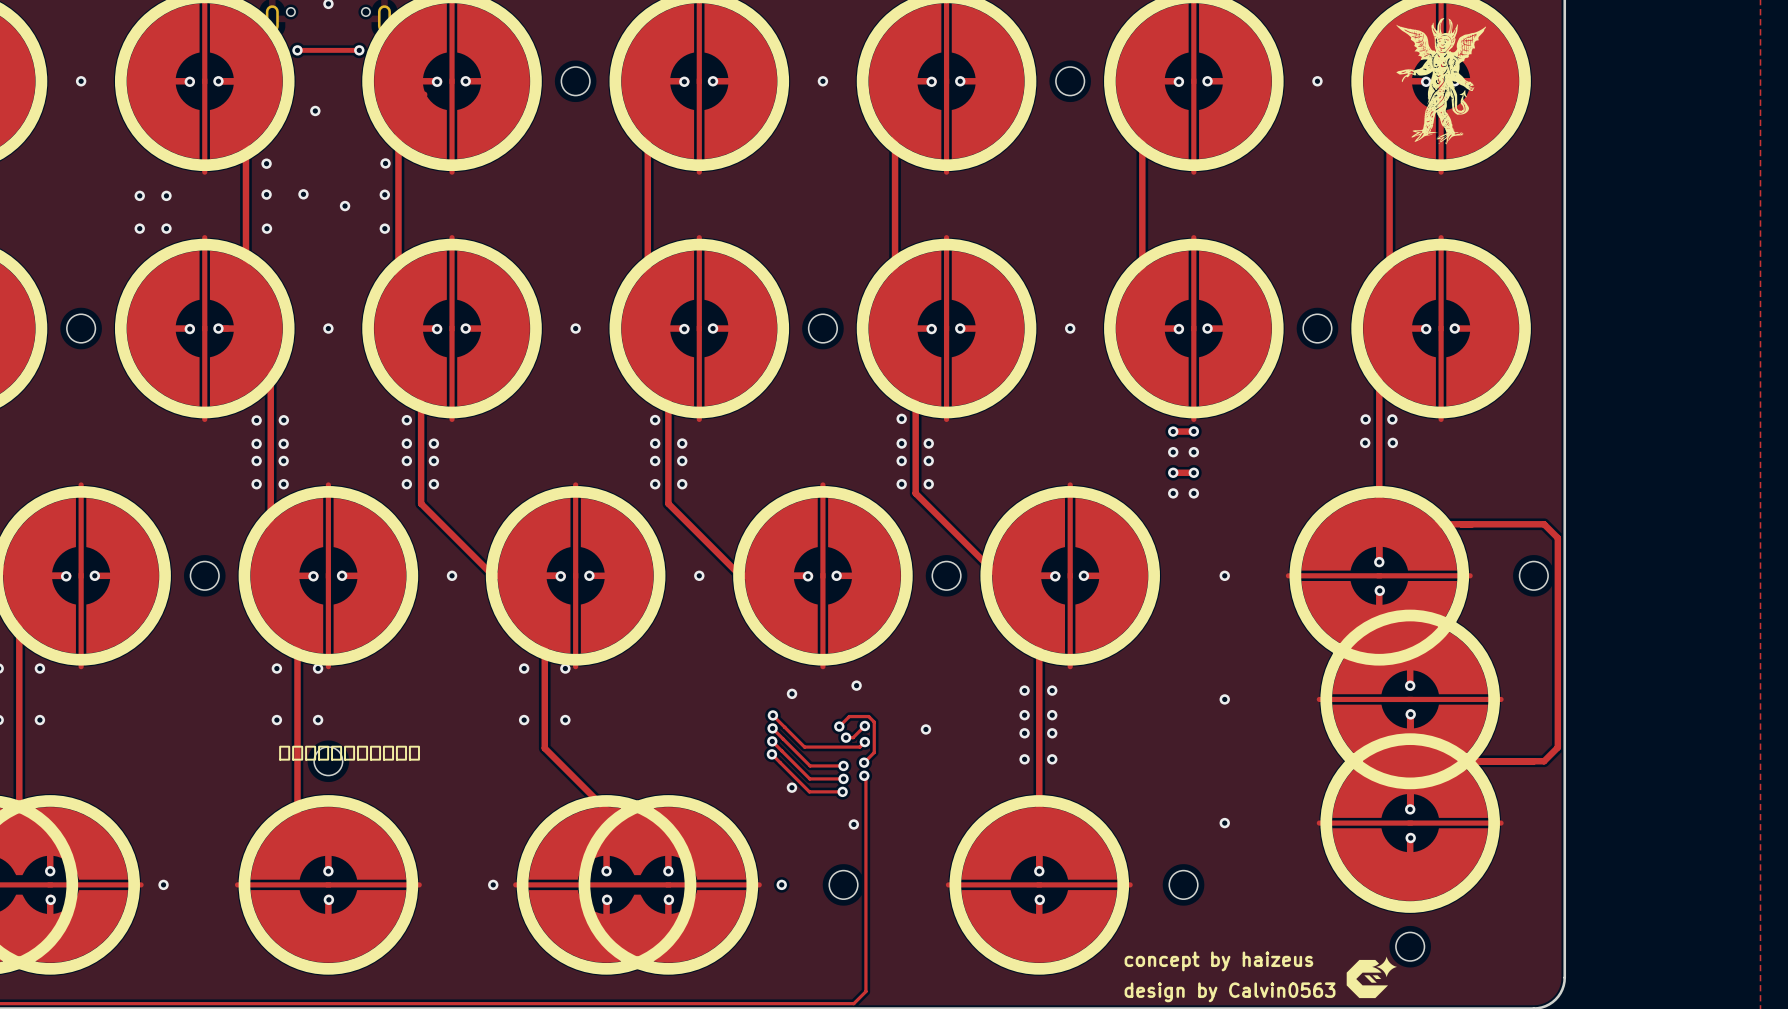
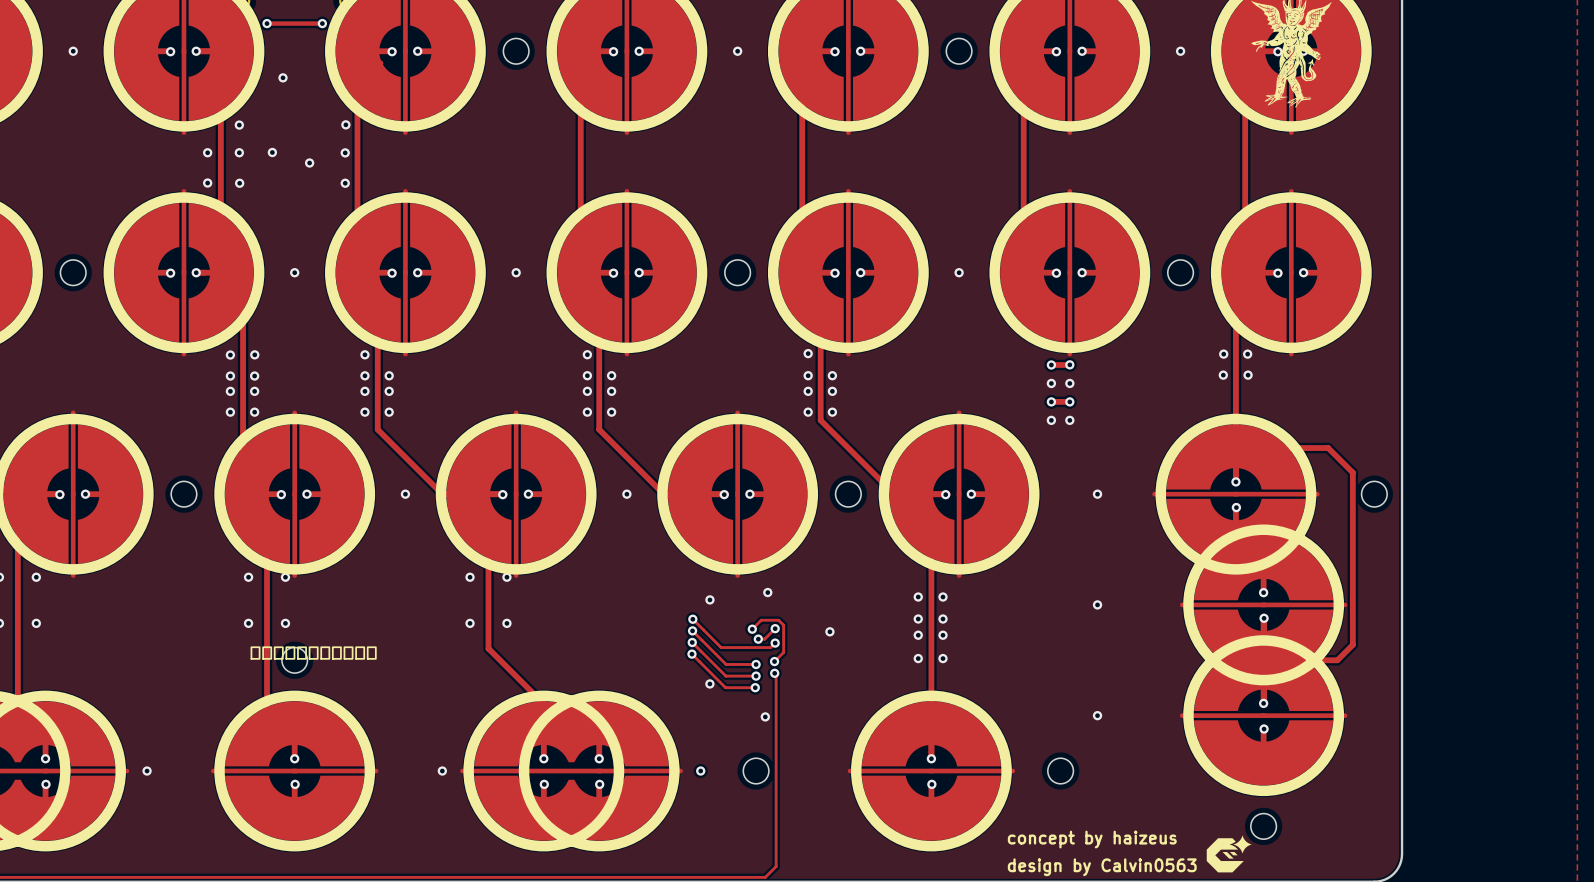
via: none -> (207, 152)
via: (139, 195) -> none
via: (166, 195) -> none
via: (139, 228) -> none
via: (166, 228) -> none
via: none -> (207, 183)
track: (1482, 524) (1544, 524) (1557, 538) (1557, 747) (1544, 761) (1492, 761) -> (1328, 448) (1352, 472) (1352, 644) (1337, 660)

